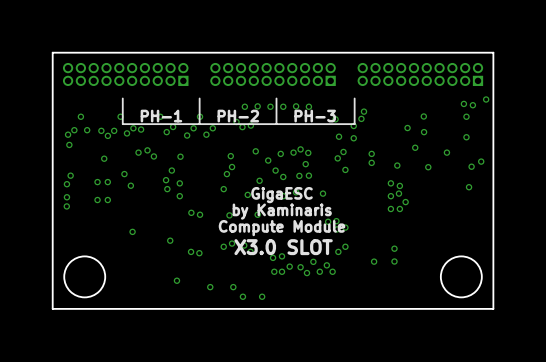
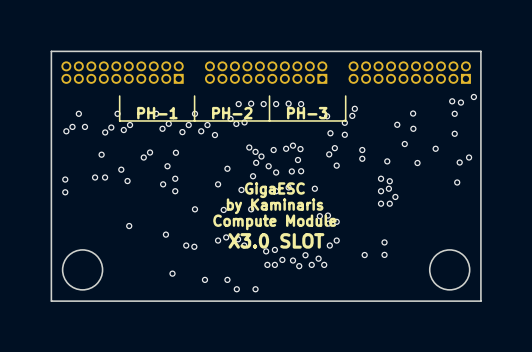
via: (141, 129) -> none
via: (101, 130) -> none
via: none -> (214, 135)
via: (69, 144) -> none
via: (147, 150) -> none
via: (138, 152) -> none
via: none -> (255, 151)
via: (230, 156) -> none
via: none -> (143, 157)
via: (232, 167) -> none
via: none -> (256, 162)
via: none -> (227, 168)
via: (226, 174) -> none
via: (70, 175) -> none
via: (166, 180) -> none
via: (97, 200) -> none
via: (107, 200) -> none
via: (66, 206) -> none
via: (191, 212) -> none

